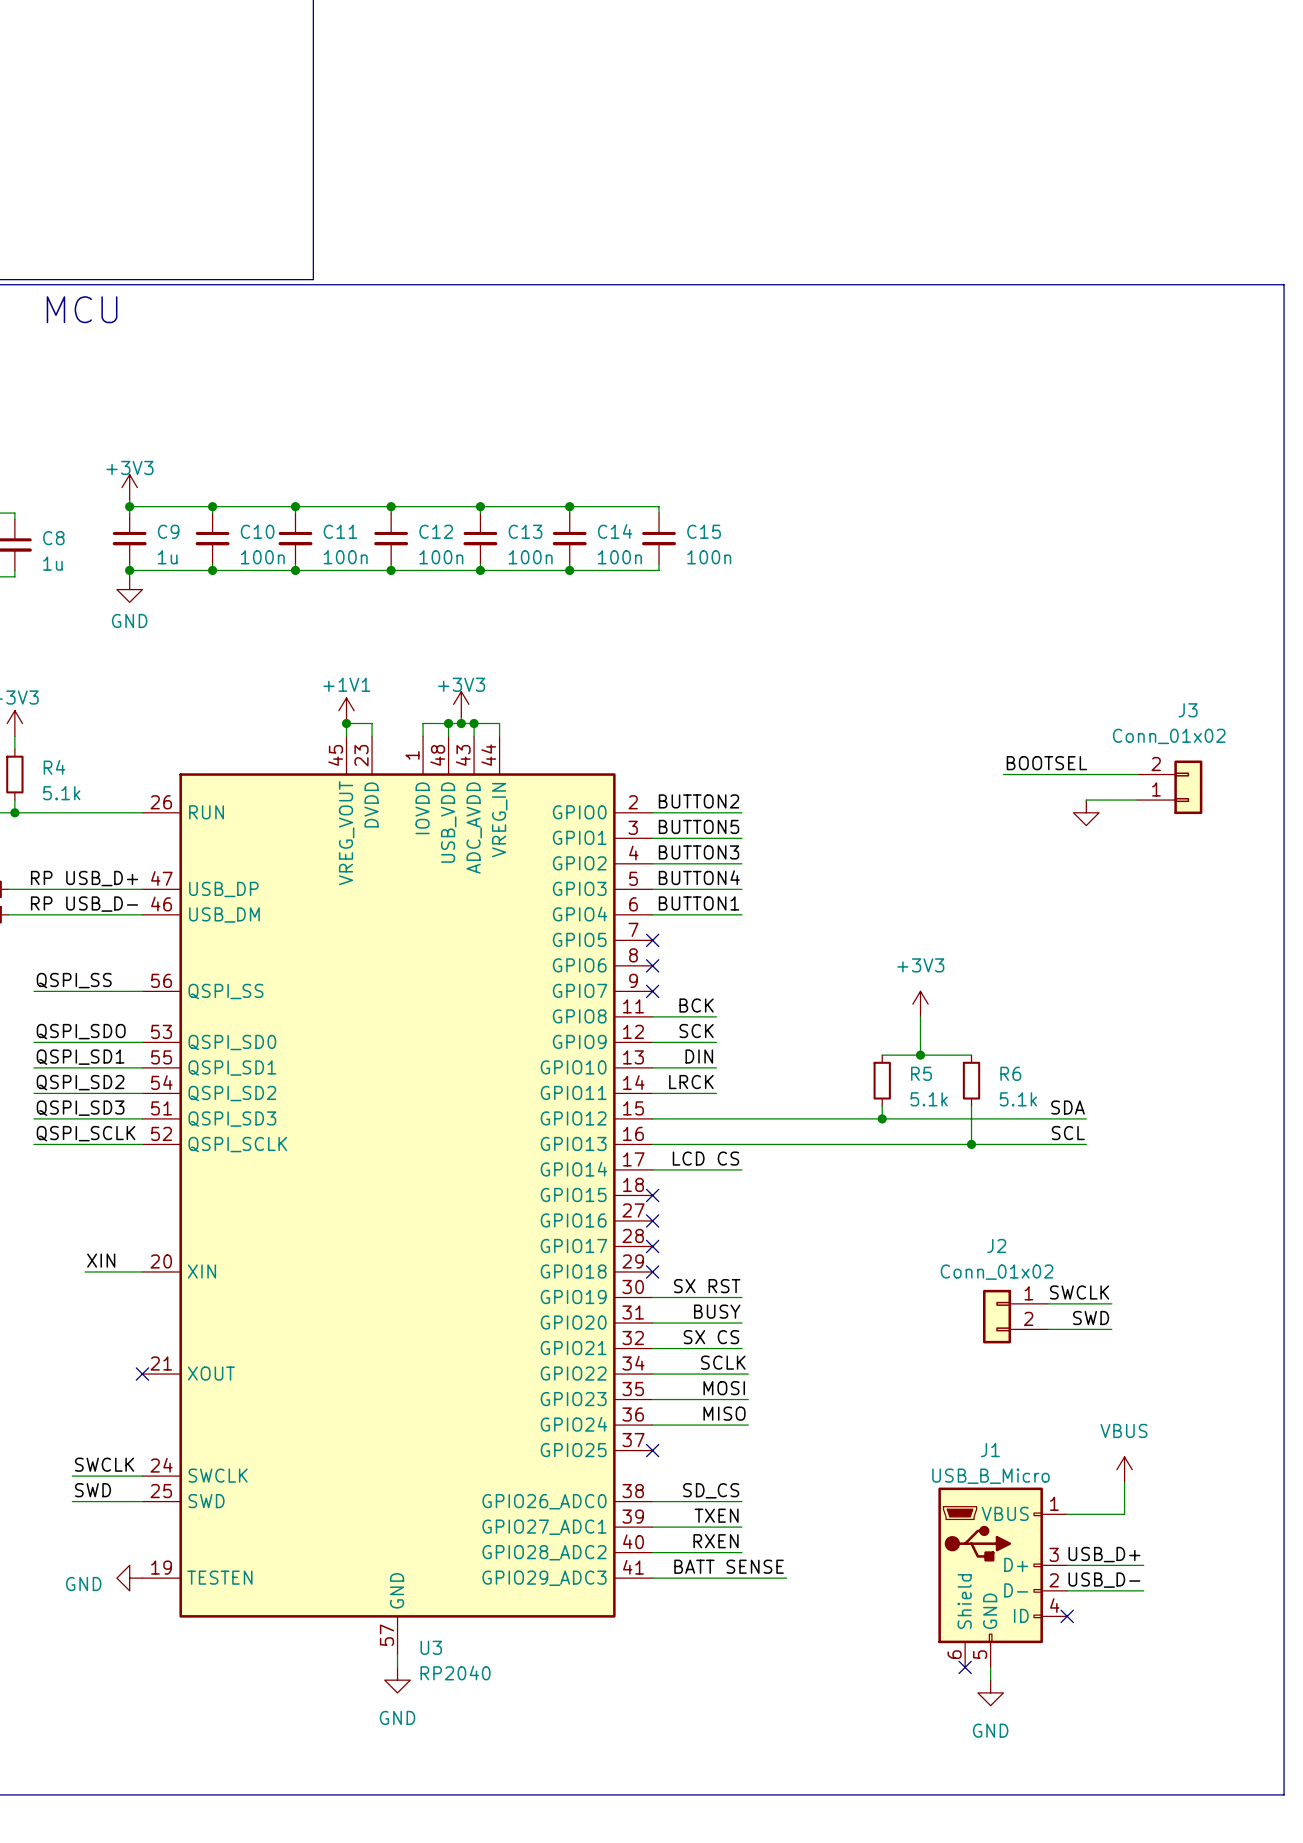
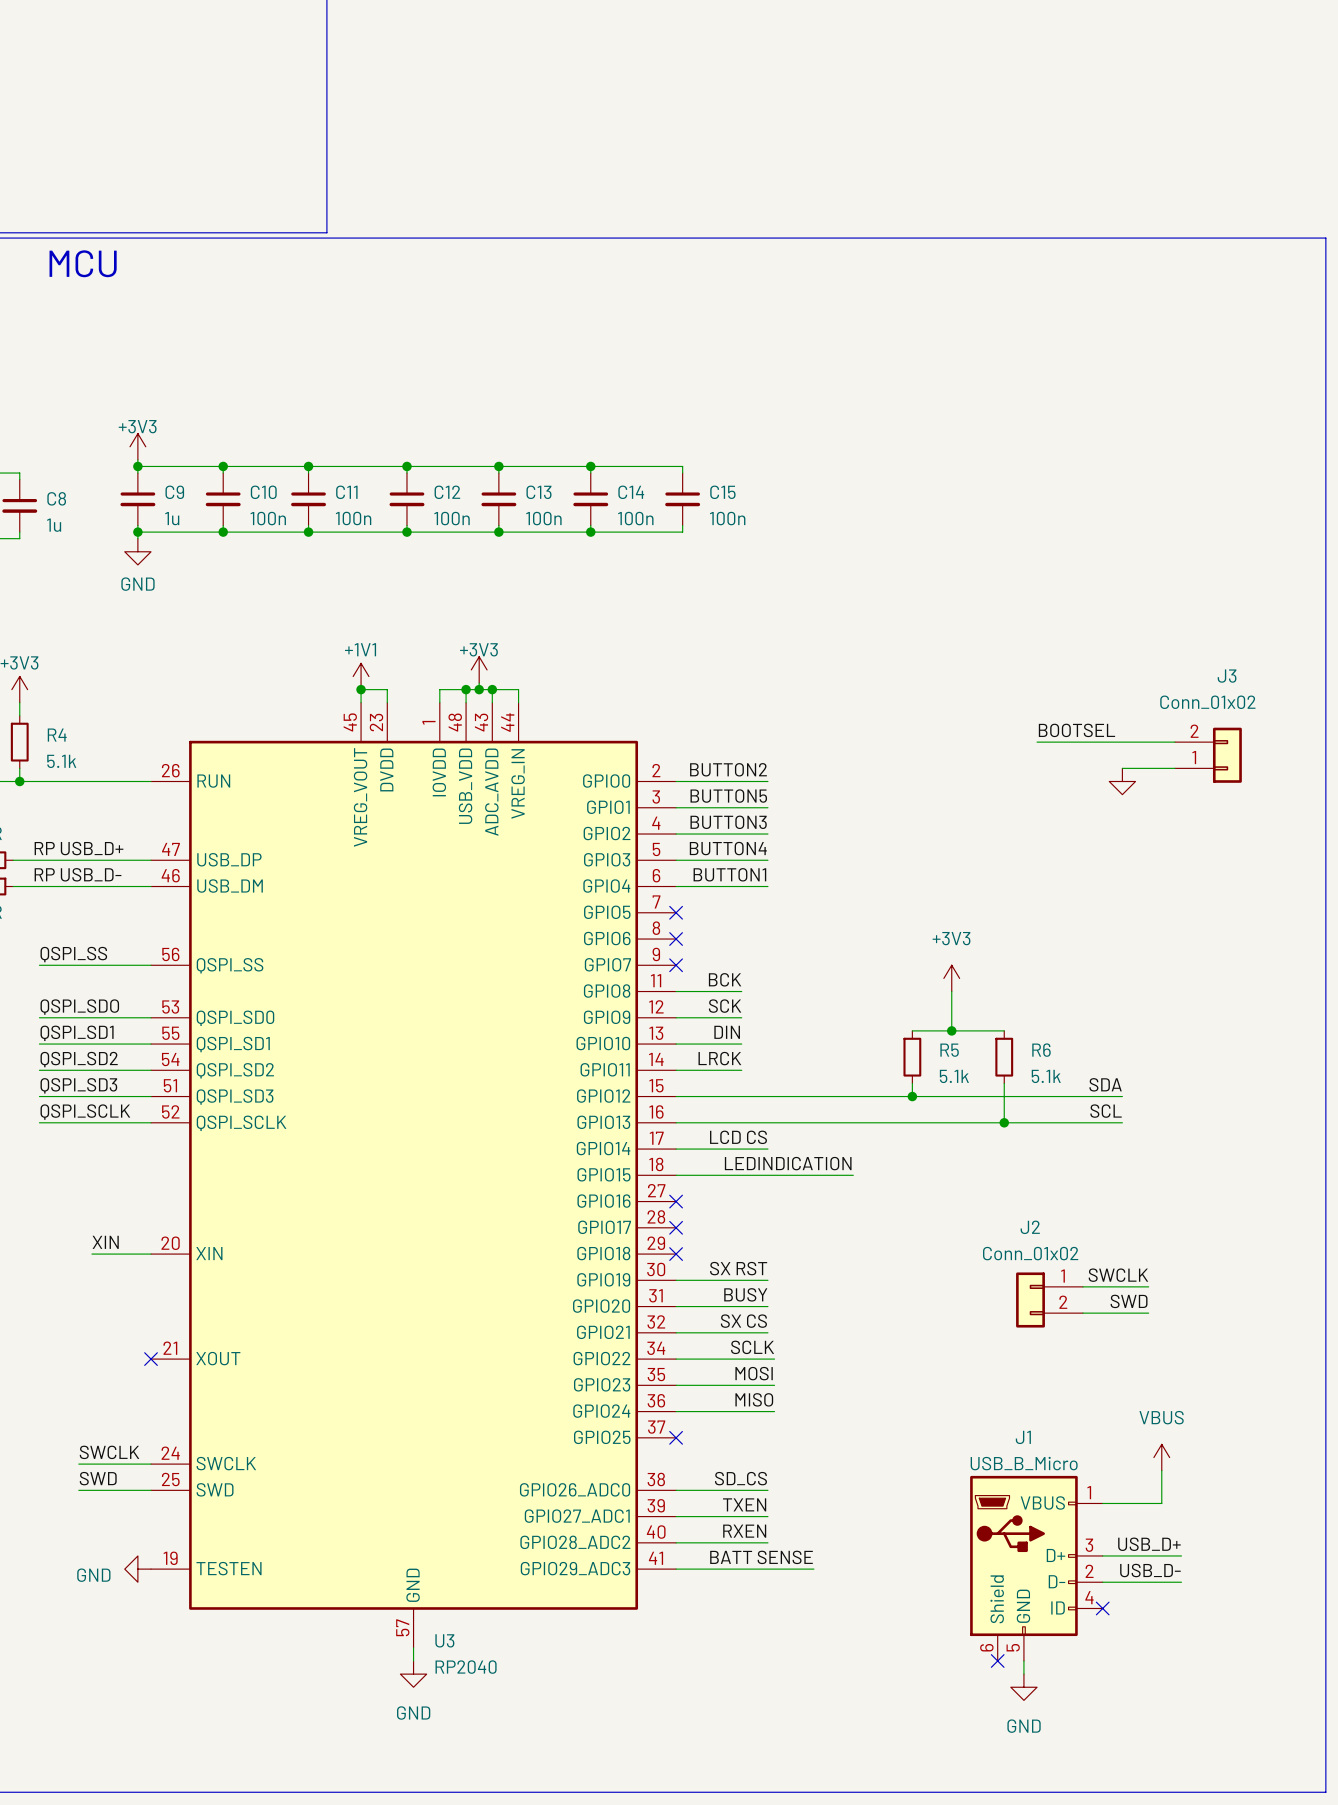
label: none -> LEDINDICATION (788, 1163)
wire: none -> (676, 1175) (853, 1175)
no-connect mark: (652, 1195) -> none

